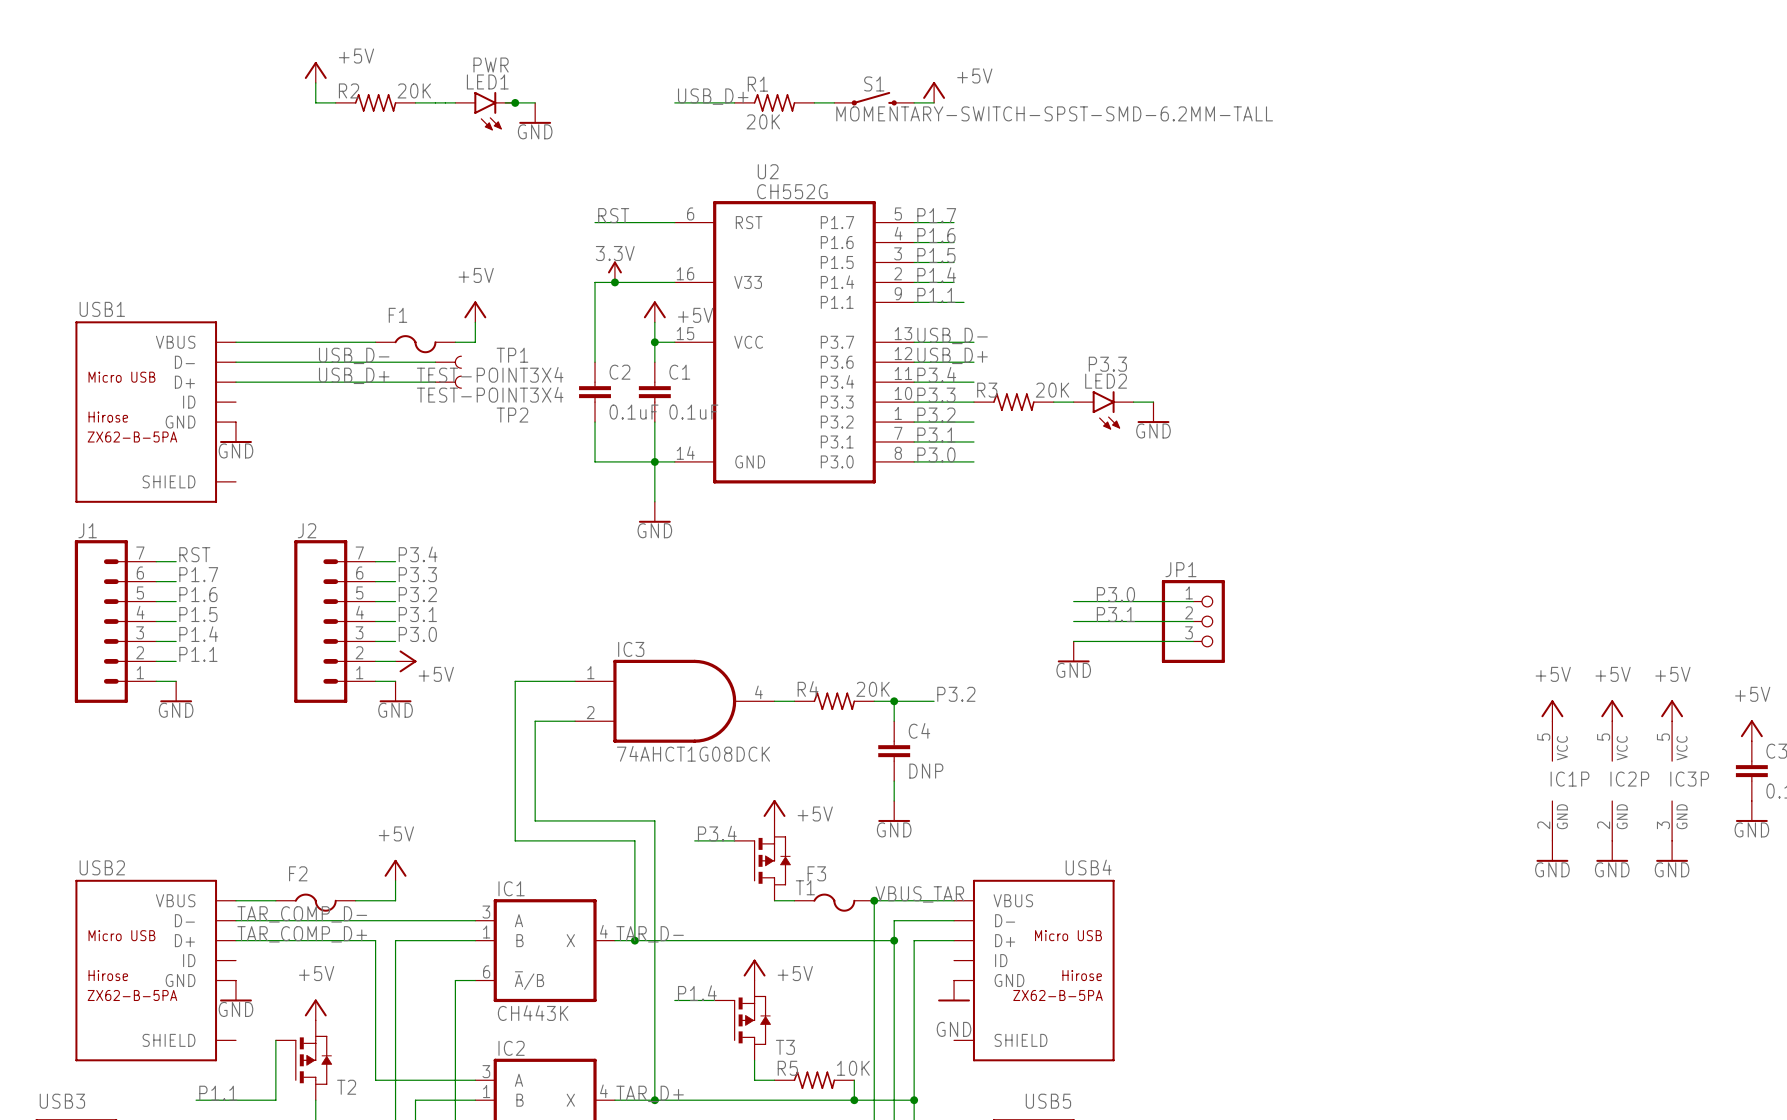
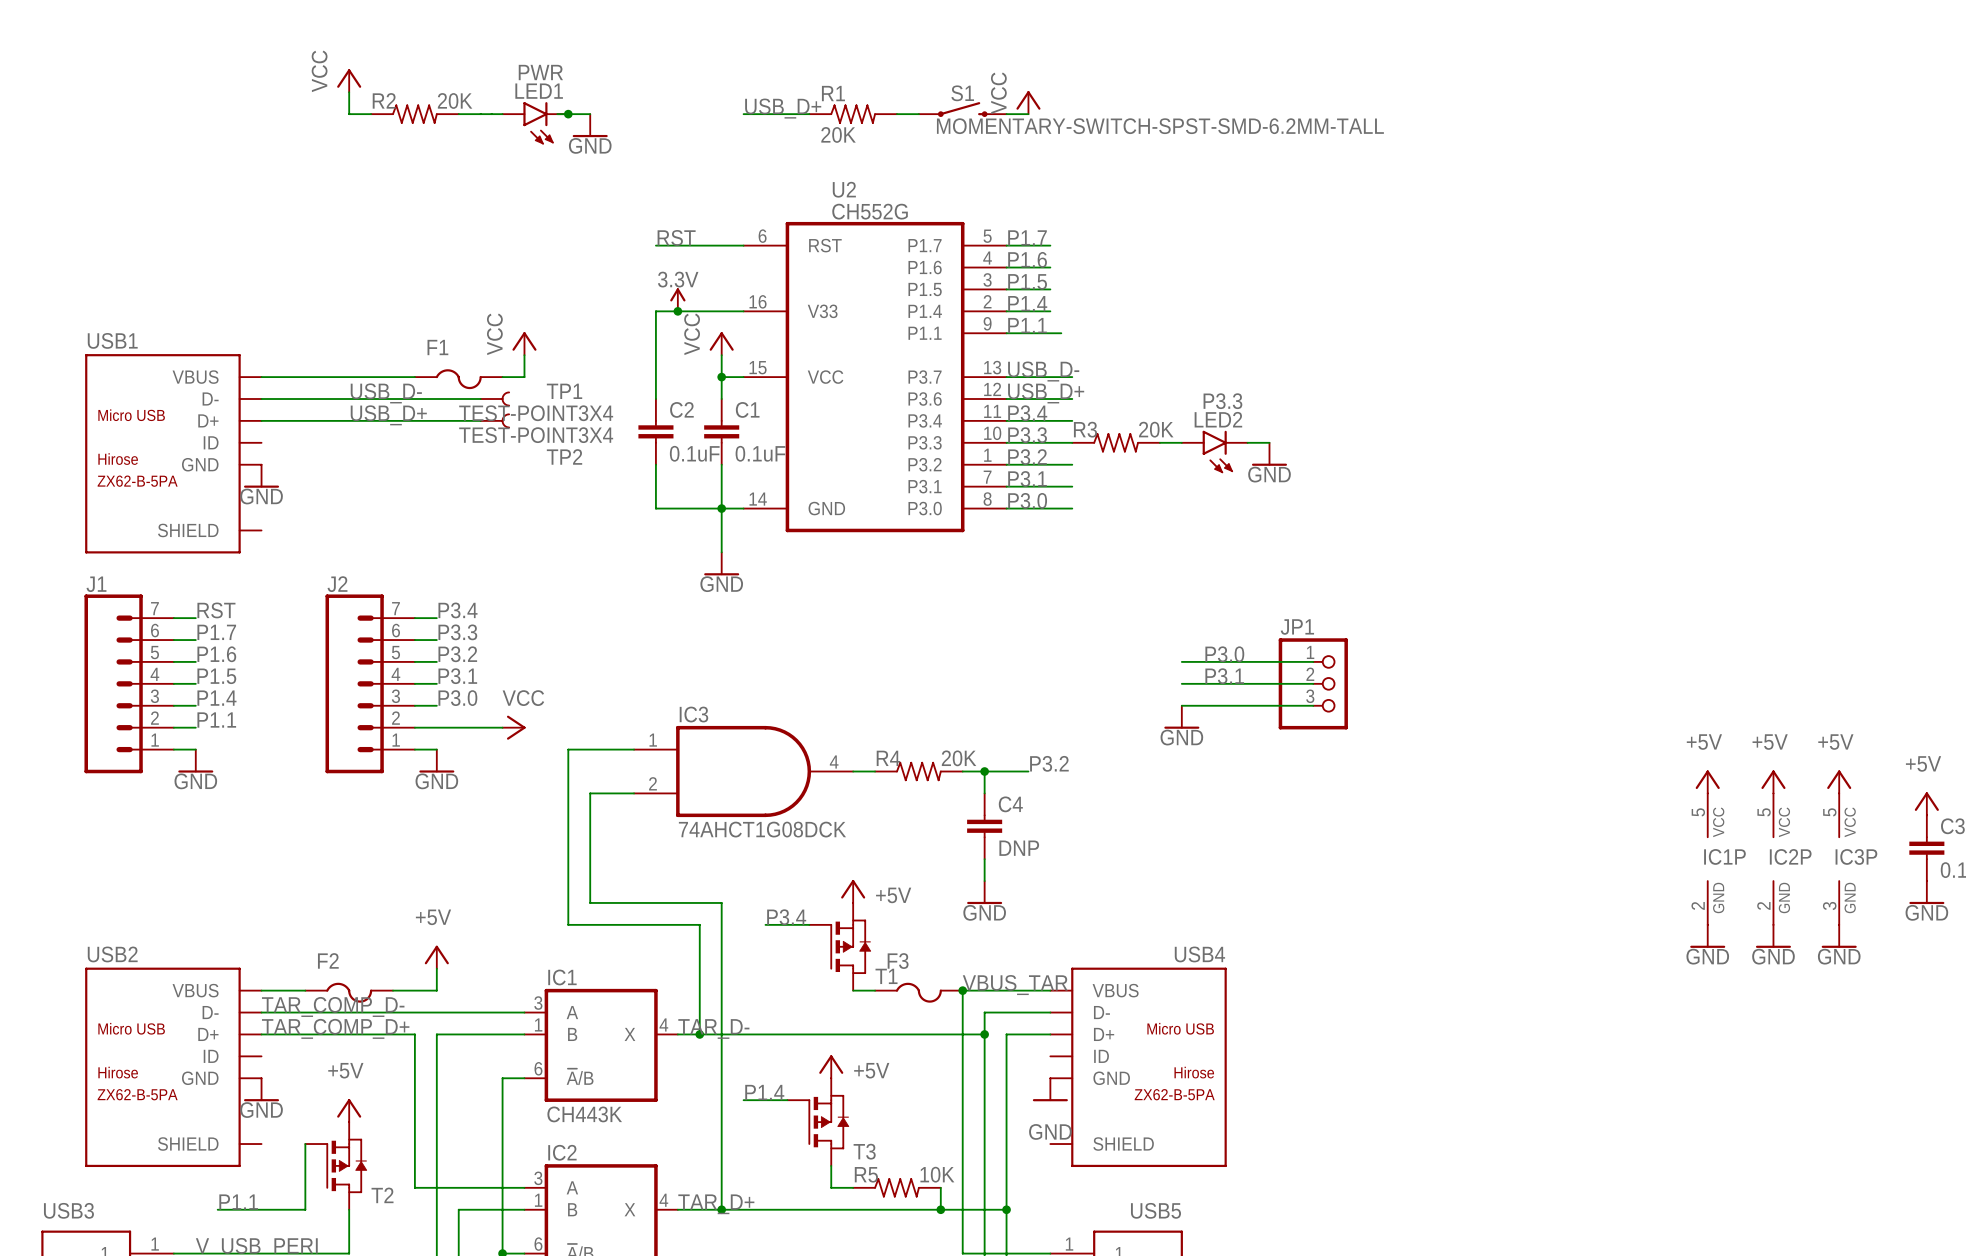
power symbol: +5V (315, 72) -> VCC (349, 80)
power symbol: +5V (934, 92) -> VCC (1028, 102)
power symbol: +5V (475, 311) -> VCC (524, 343)
power symbol: +5V (654, 311) -> VCC (721, 343)
wire: none -> (436, 727) (502, 727)
power symbol: +5V (406, 661) -> none
power symbol: none -> VCC (514, 727)

